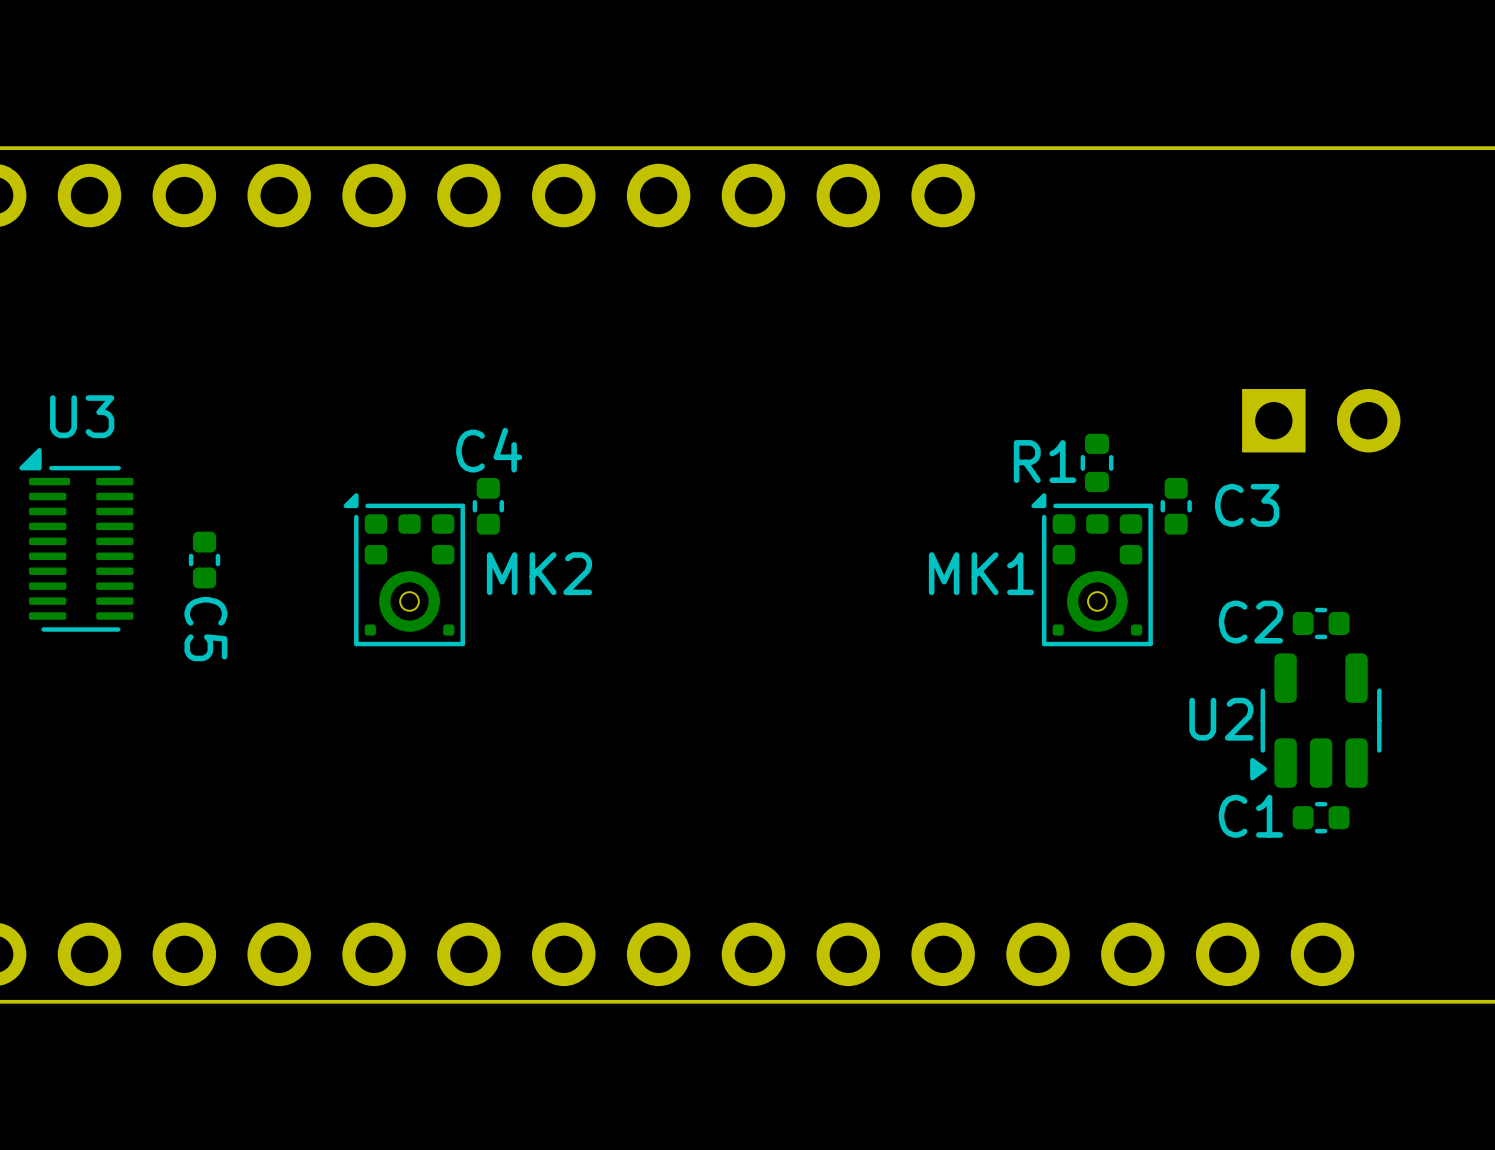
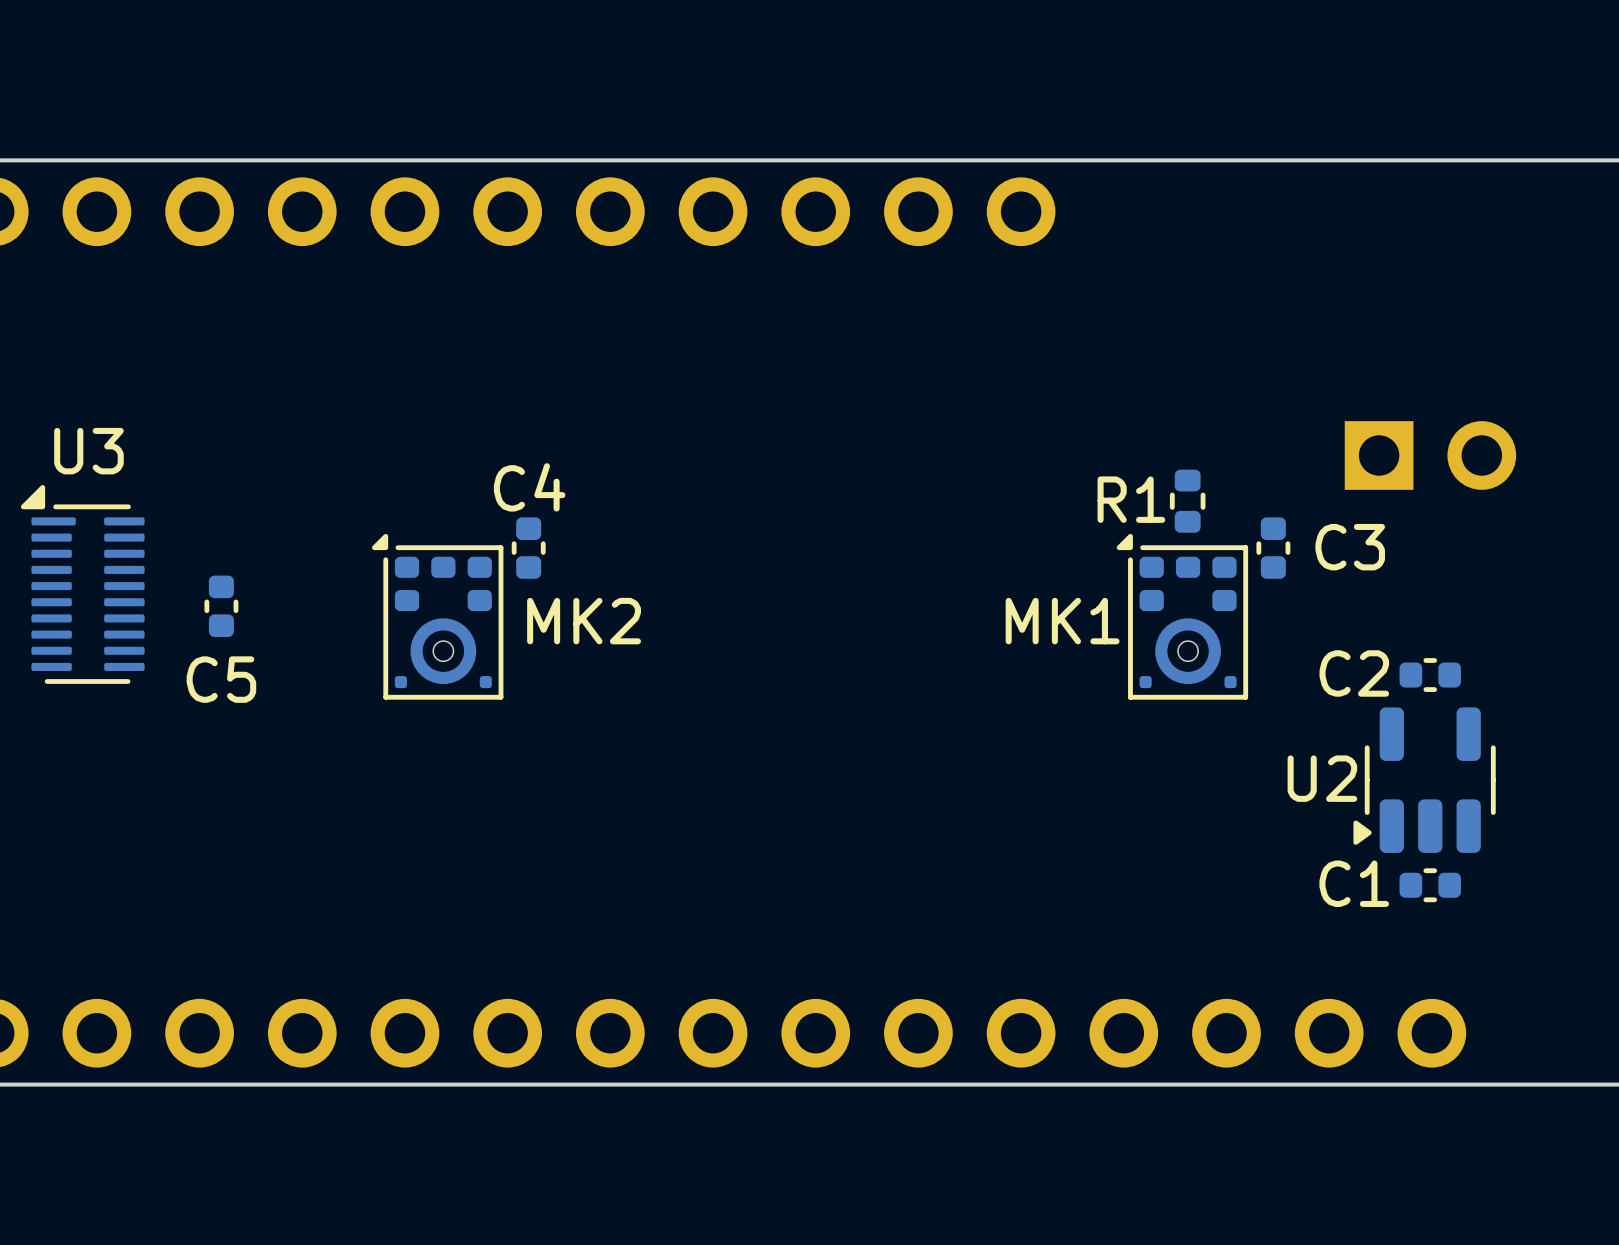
C5 name rotation: 0° (205, 629) -> 90° counterclockwise (221, 679)

